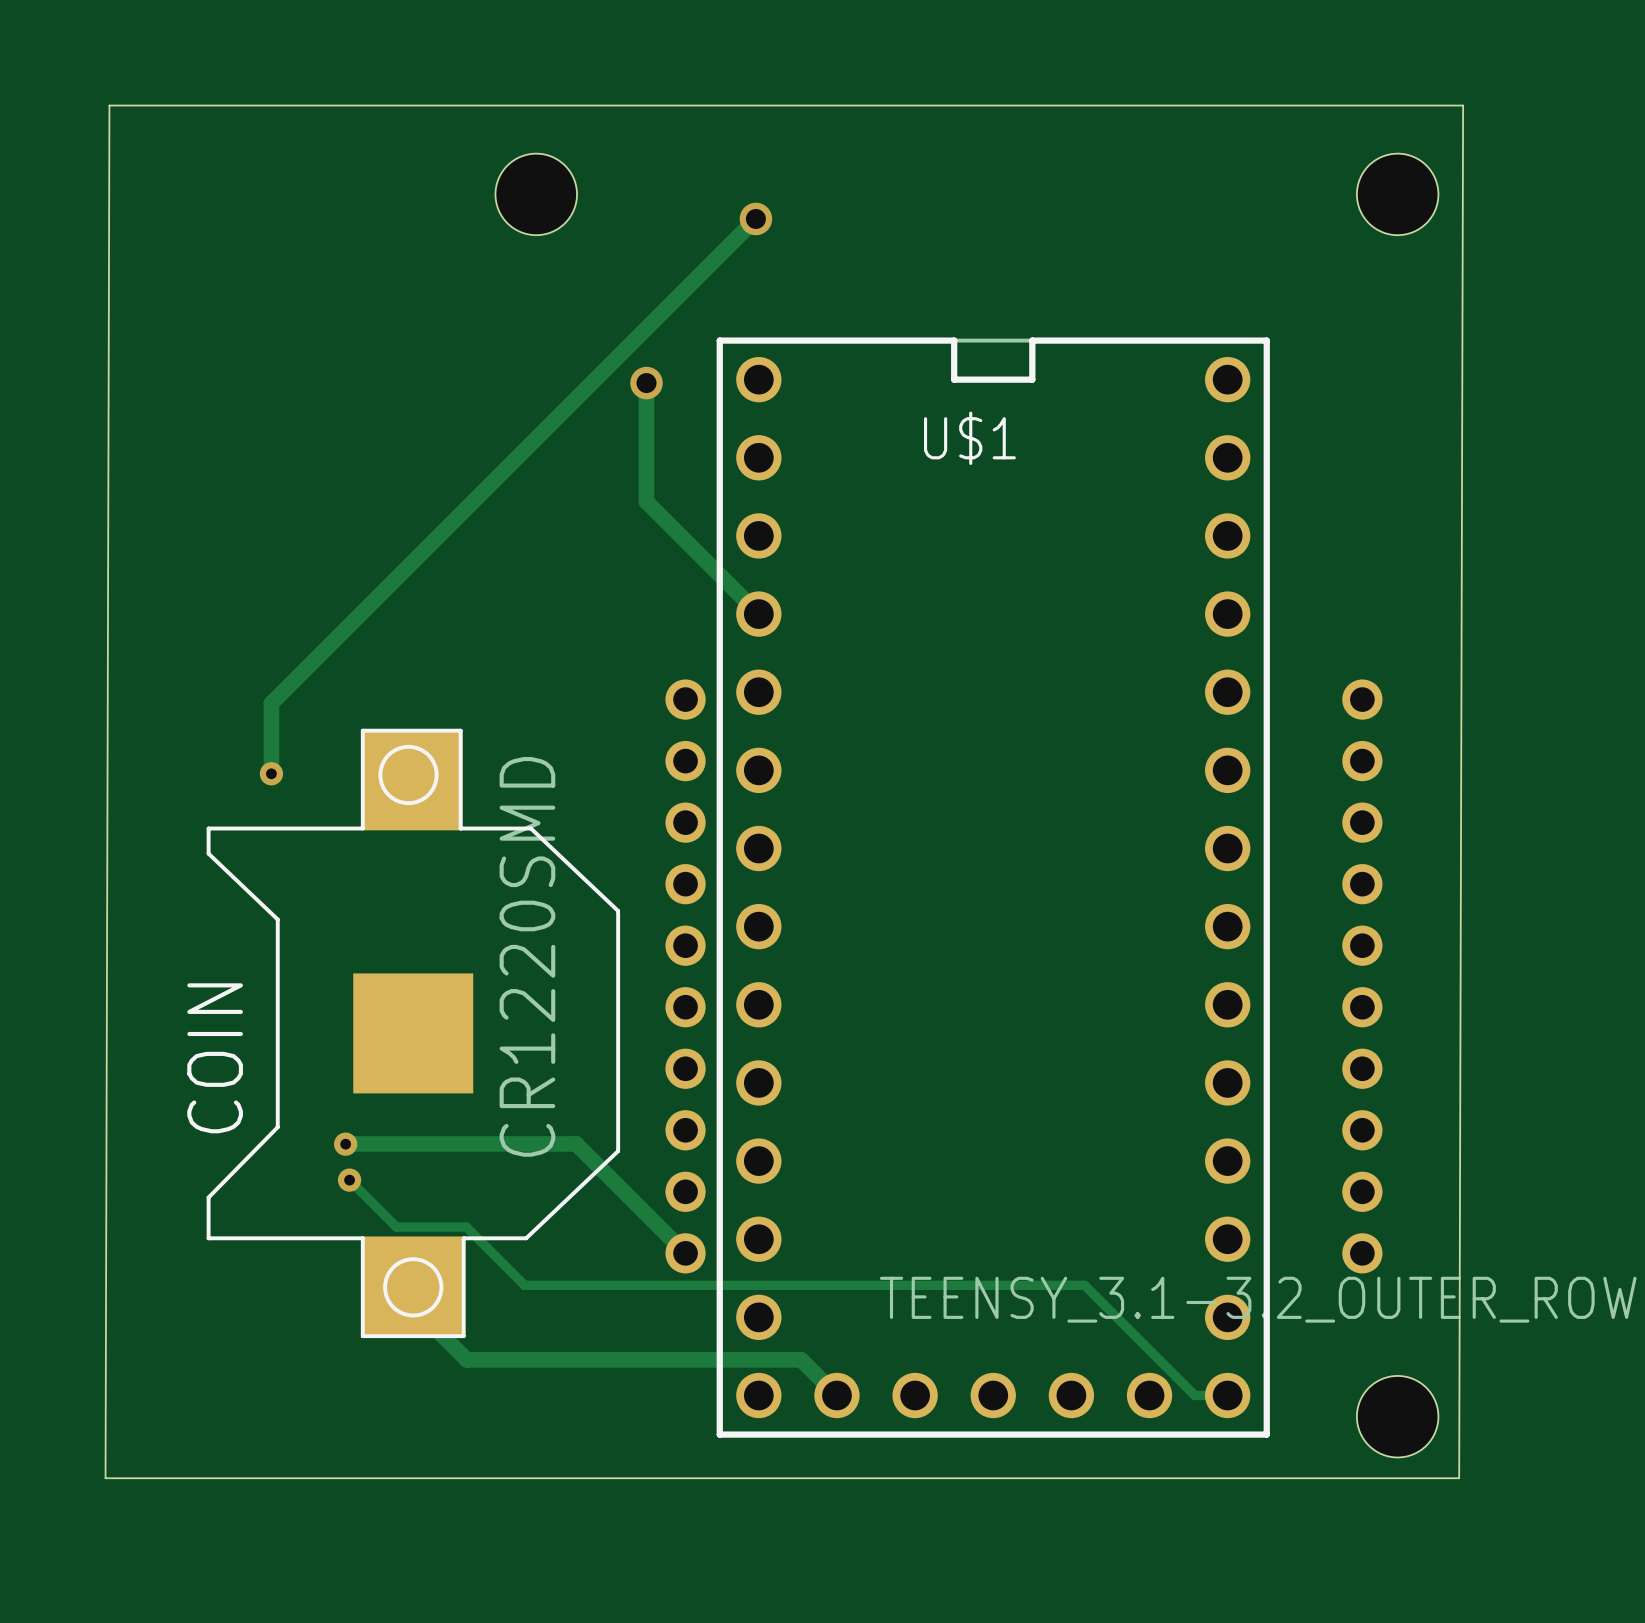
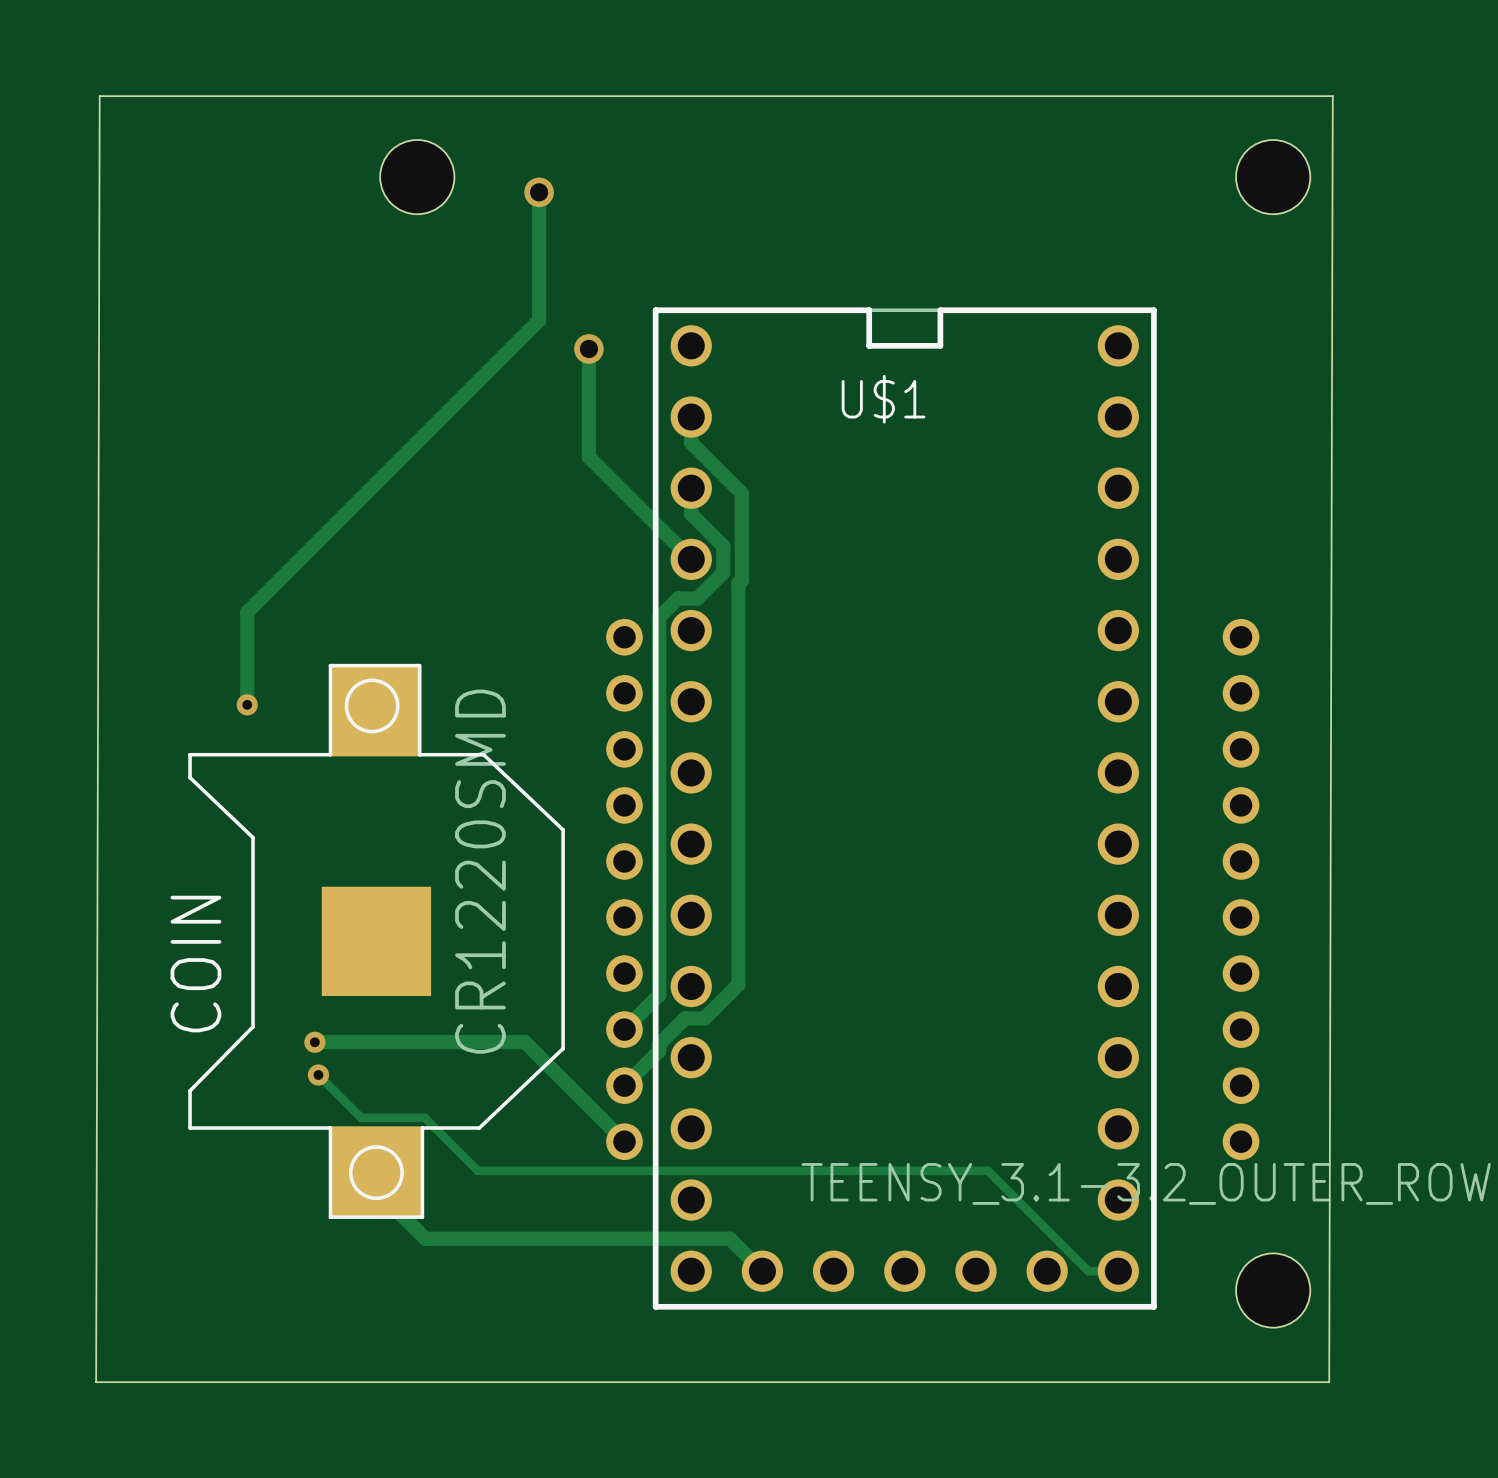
board edge: (1463, 105) (1459, 1478) (105, 1478) (109, 105) -> (1332, 96) (1329, 1382) (96, 1382) (99, 96)
hole position: (536, 194) -> (417, 177)
track: (755, 218) (271, 703) -> (539, 192) (539, 320) (247, 612) (247, 640)
via position: (755, 218) -> (539, 192)
track: none -> (691, 417) (691, 442) (741, 493) (741, 580) (738, 583) (738, 984) (704, 1018) (685, 1018) (659, 1044) (659, 1050) (624, 1085)
track: none -> (691, 488) (691, 514) (723, 546) (723, 572) (697, 598) (677, 598) (659, 617) (659, 994) (624, 1029)

